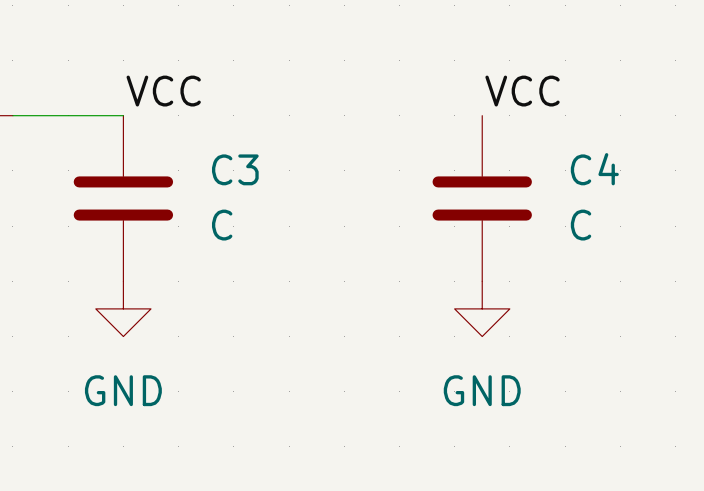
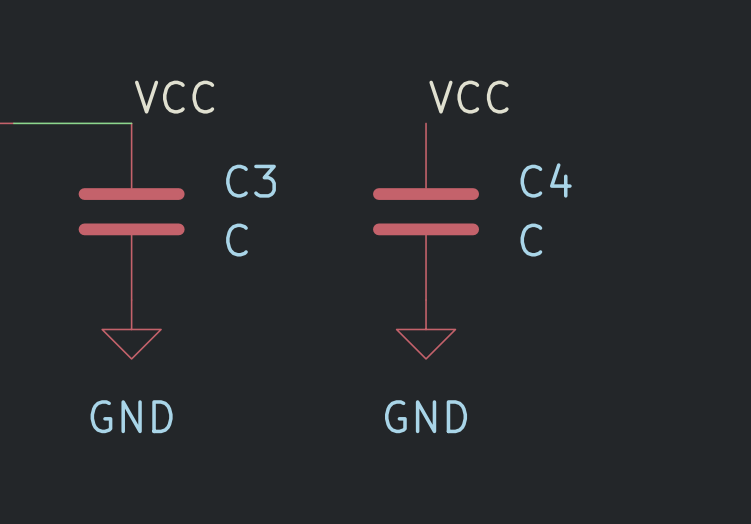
label position: VCC (522, 91) -> VCC (469, 97)
C4 position: (482, 198) -> (426, 211)
power symbol position: GND (482, 308) -> GND (426, 329)

